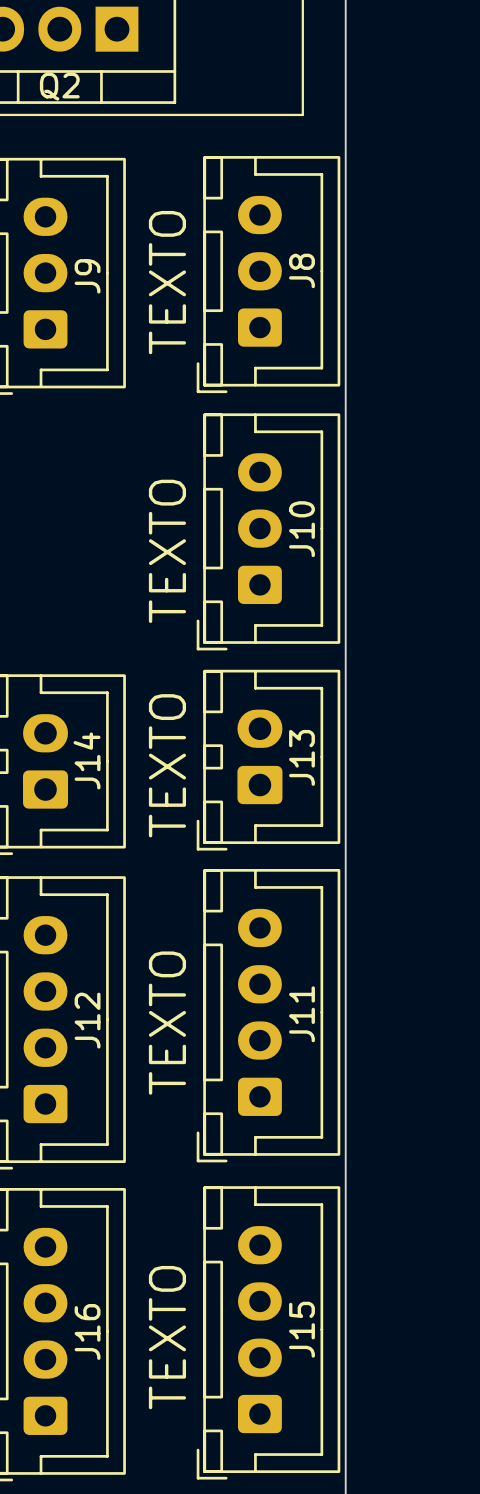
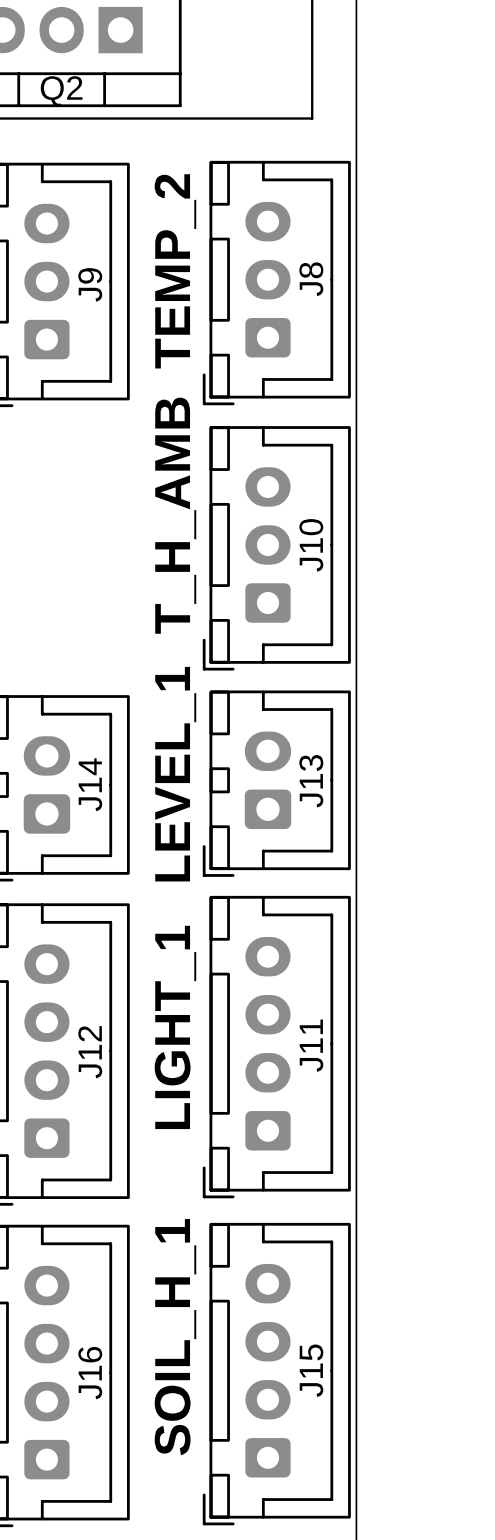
text: TEXTO (167, 282) -> TEMP_2 (175, 271)
text: TEXTO (167, 551) -> T_H_AMB (175, 515)
text: TEXTO (167, 765) -> LEVEL_1 (175, 774)
text: TEXTO (167, 1023) -> LIGHT_1 (175, 1027)
text: TEXTO (167, 1337) -> SOIL_H_1 (175, 1337)

